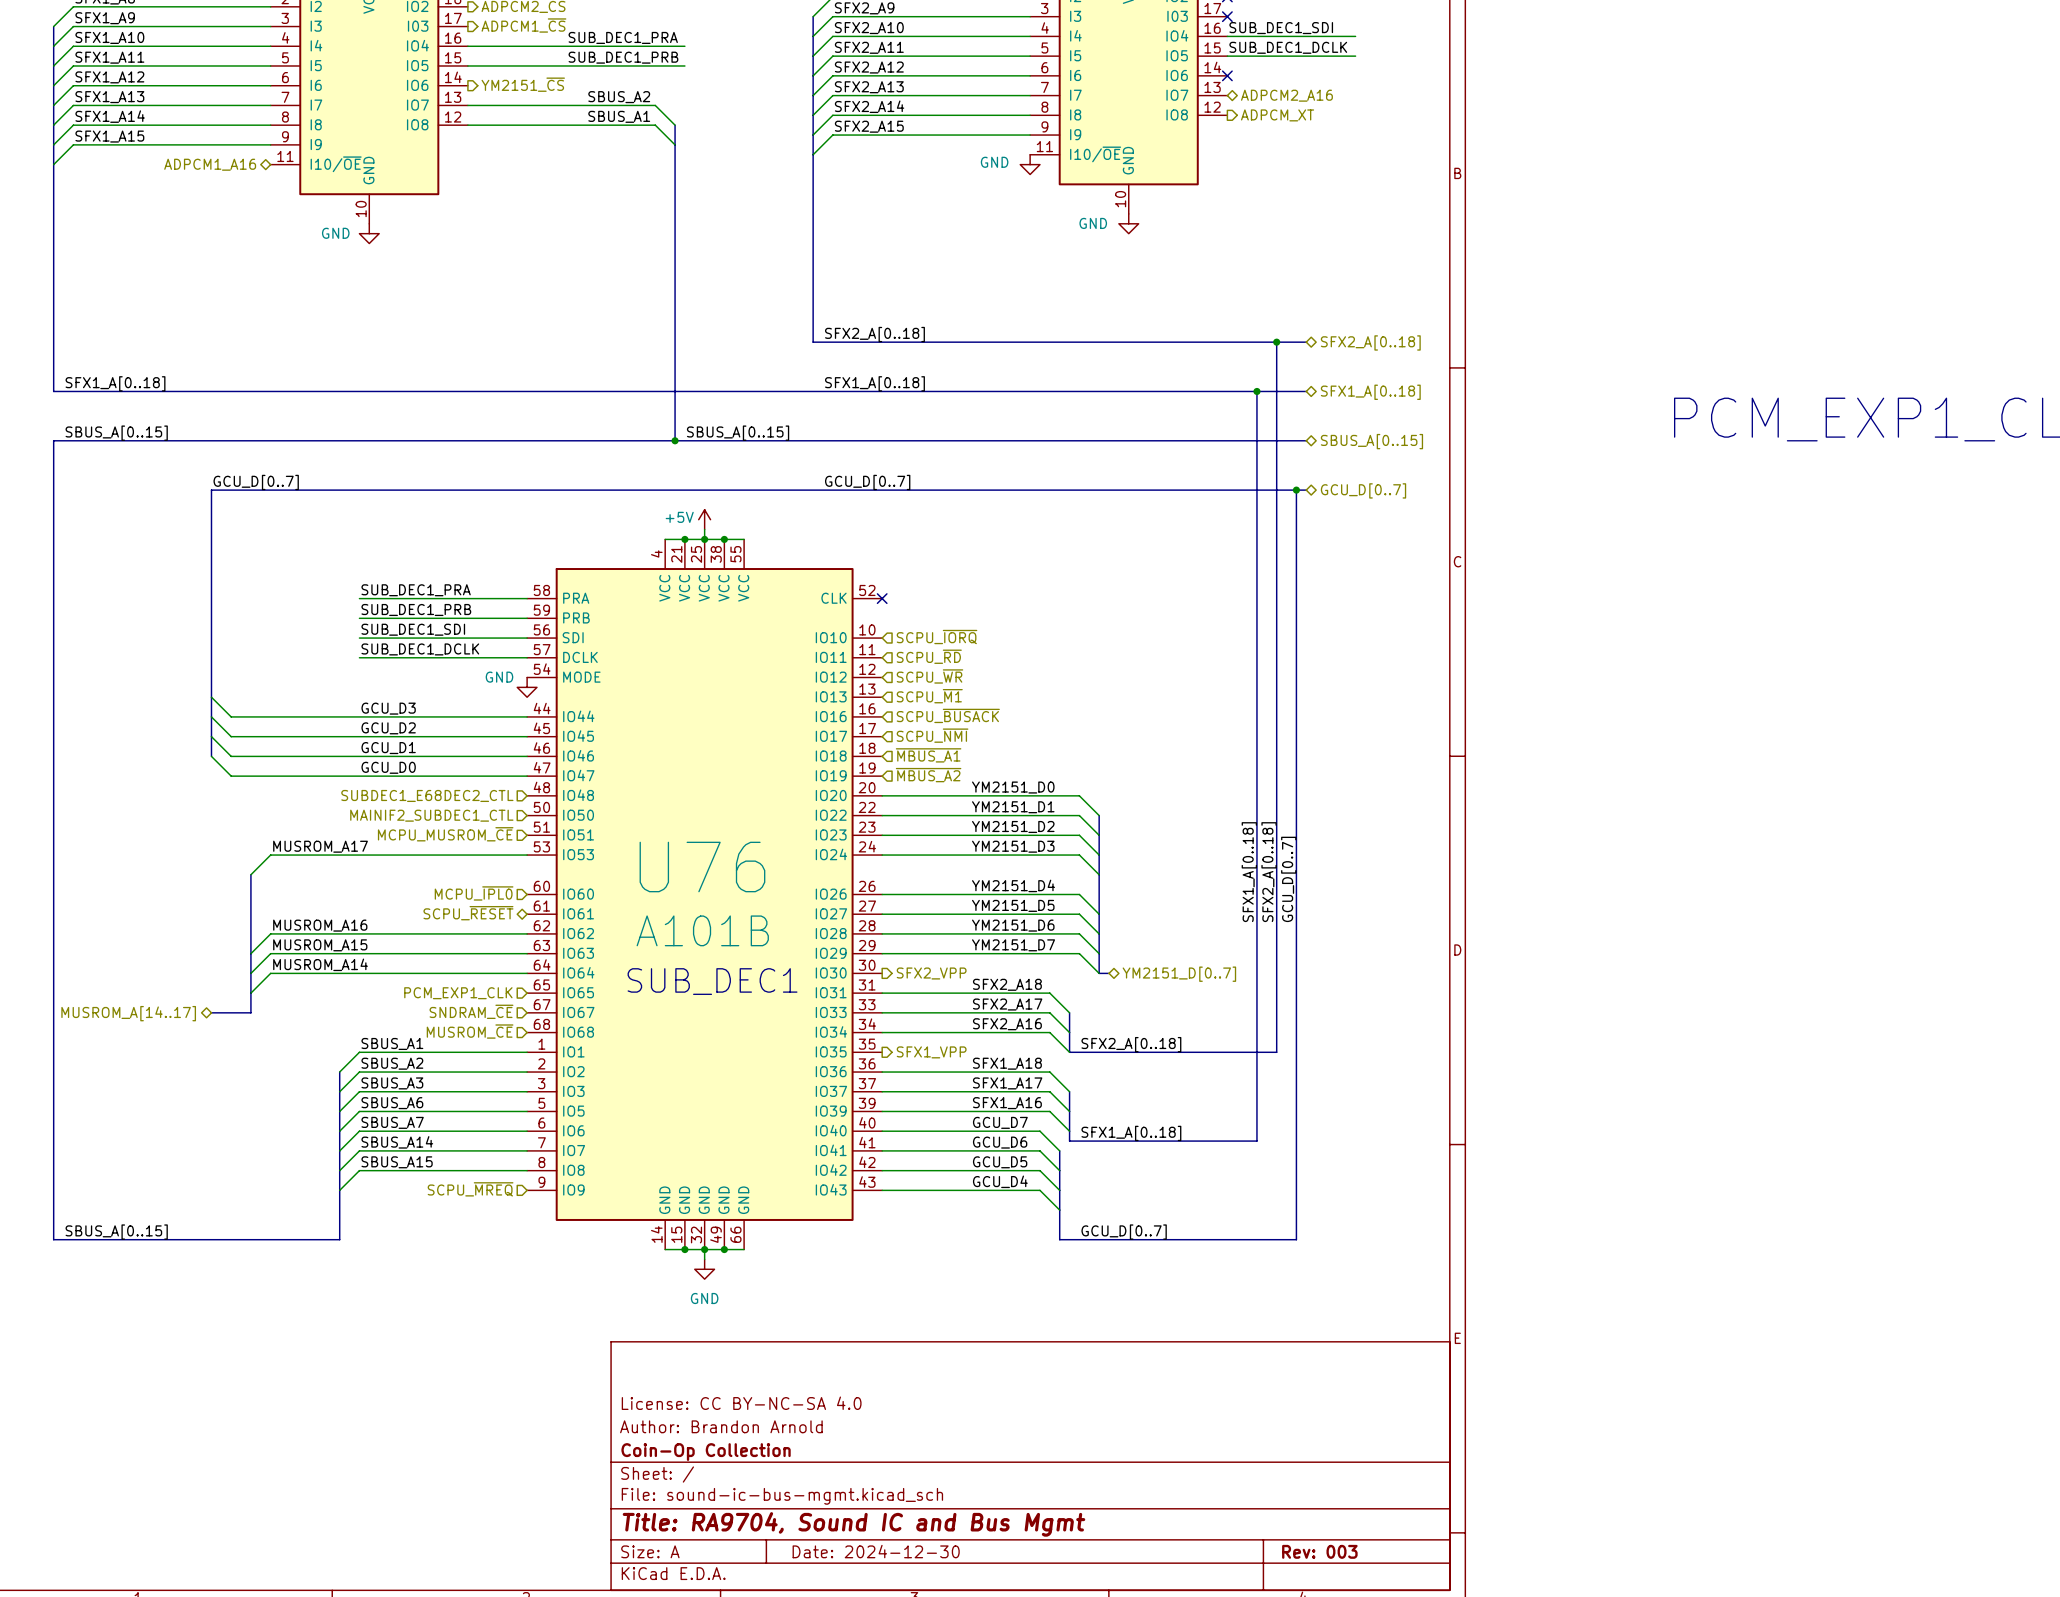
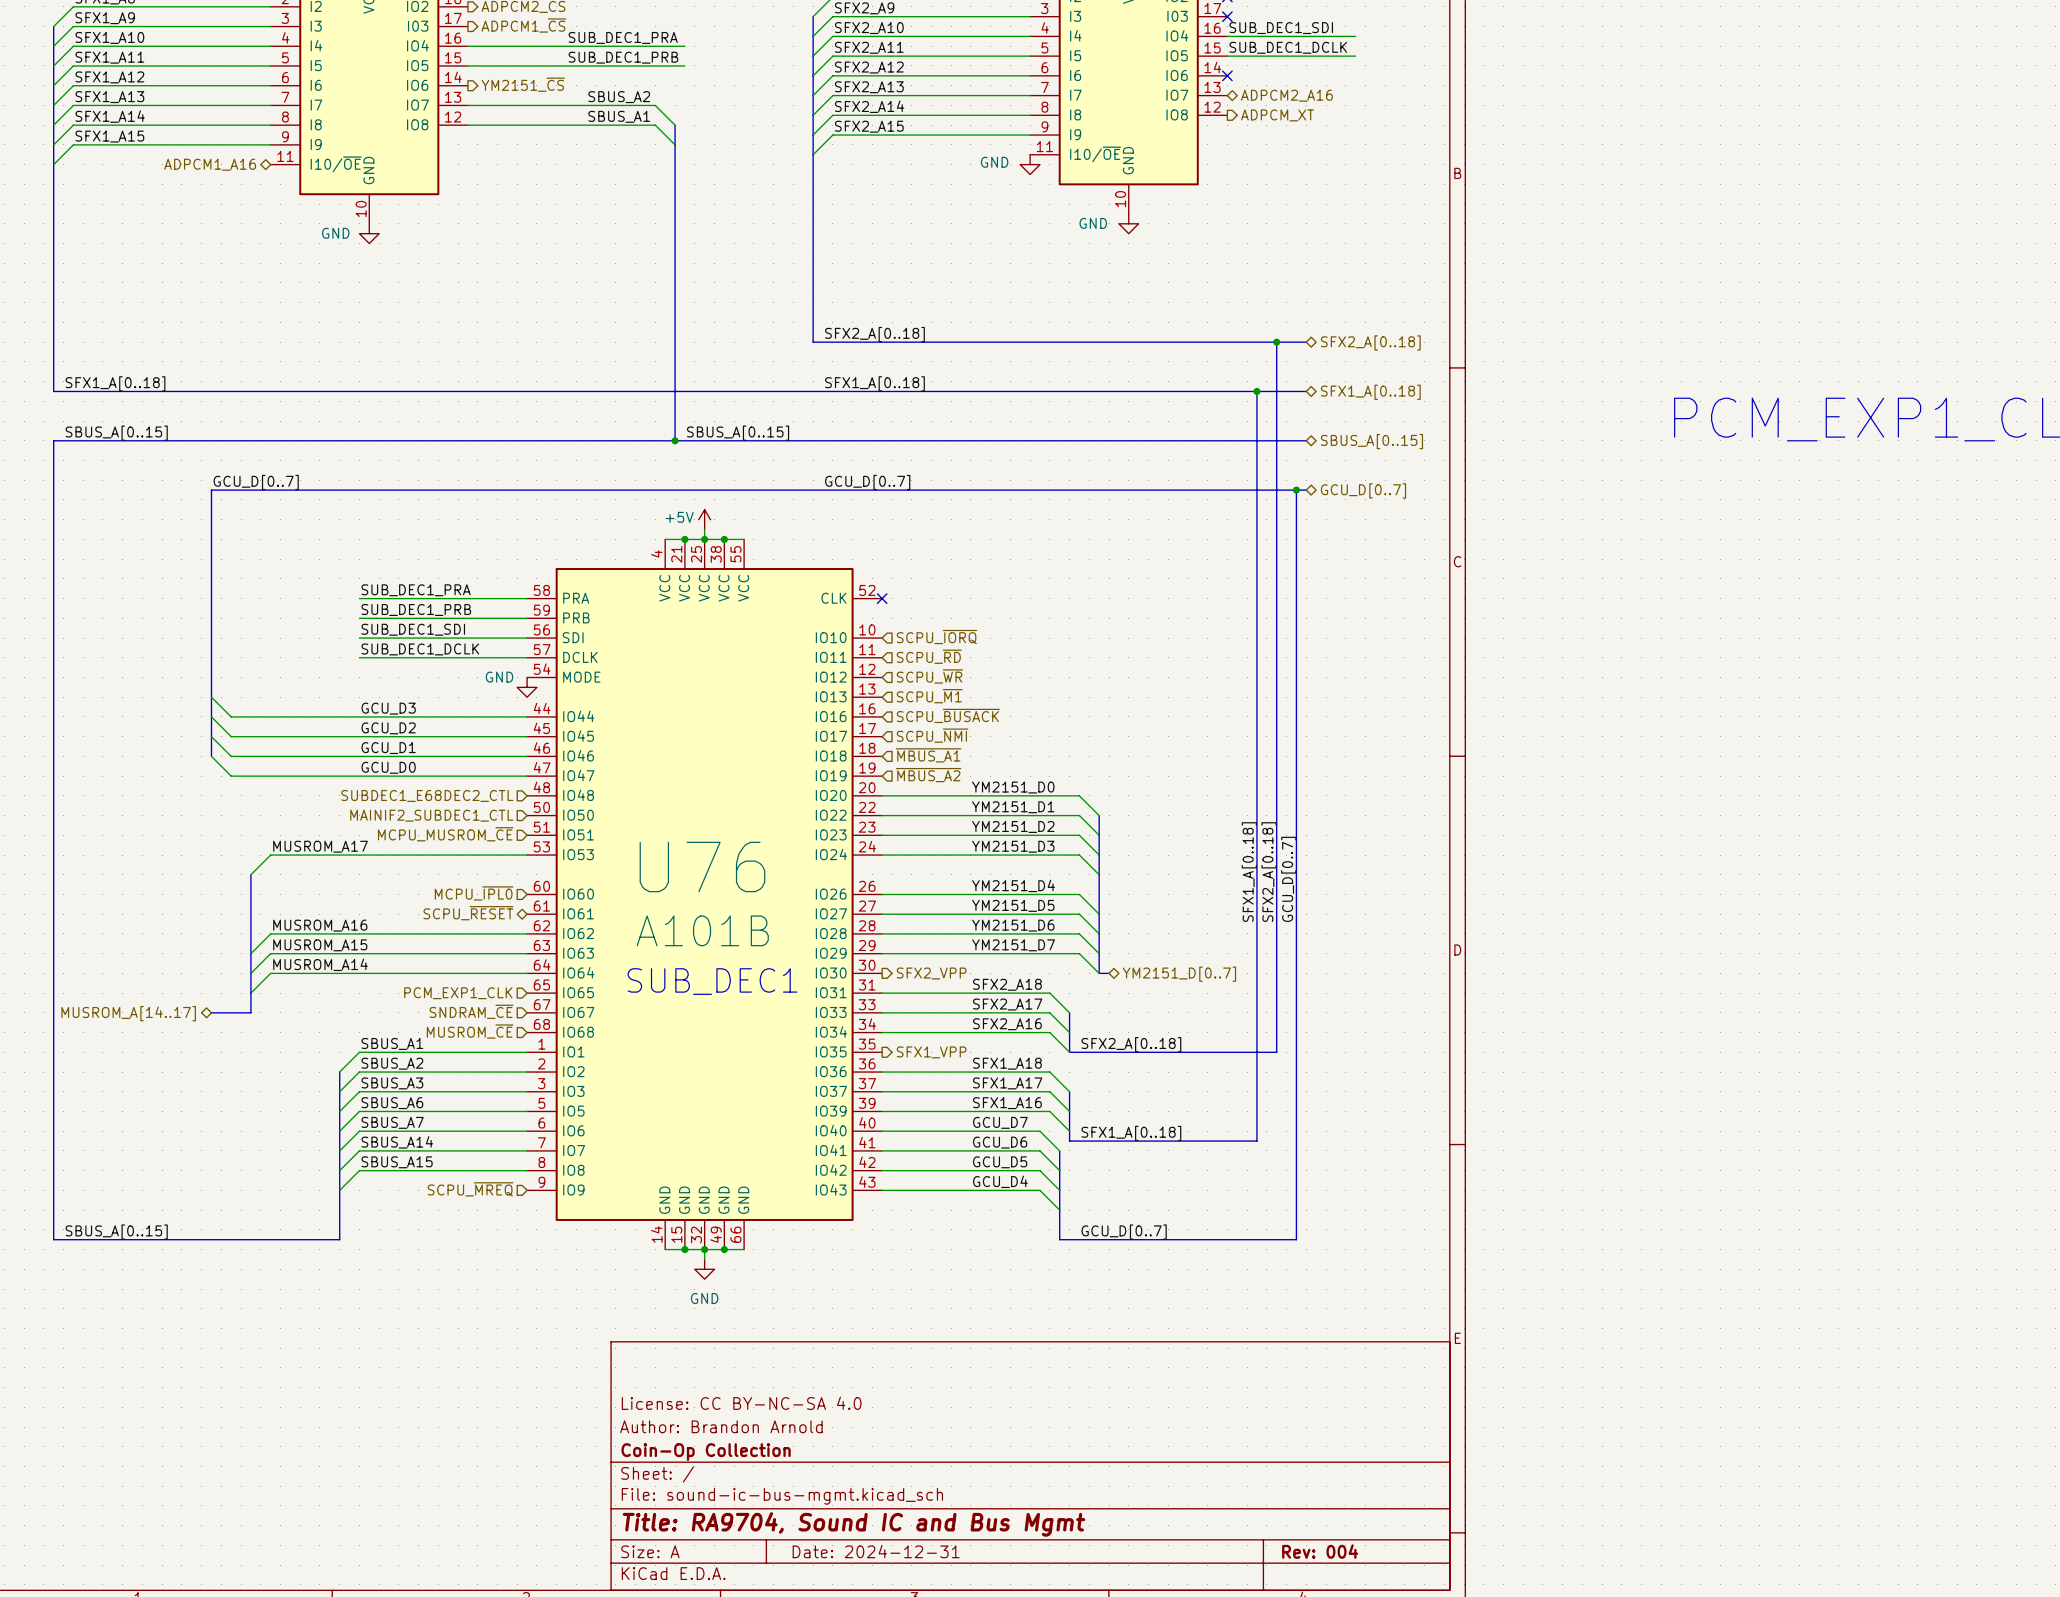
title block: Date: 2024-12-30 (876, 1551) -> Date: 2024-12-31 (876, 1551)
title block: Rev: 003 (1319, 1551) -> Rev: 004 (1320, 1551)

